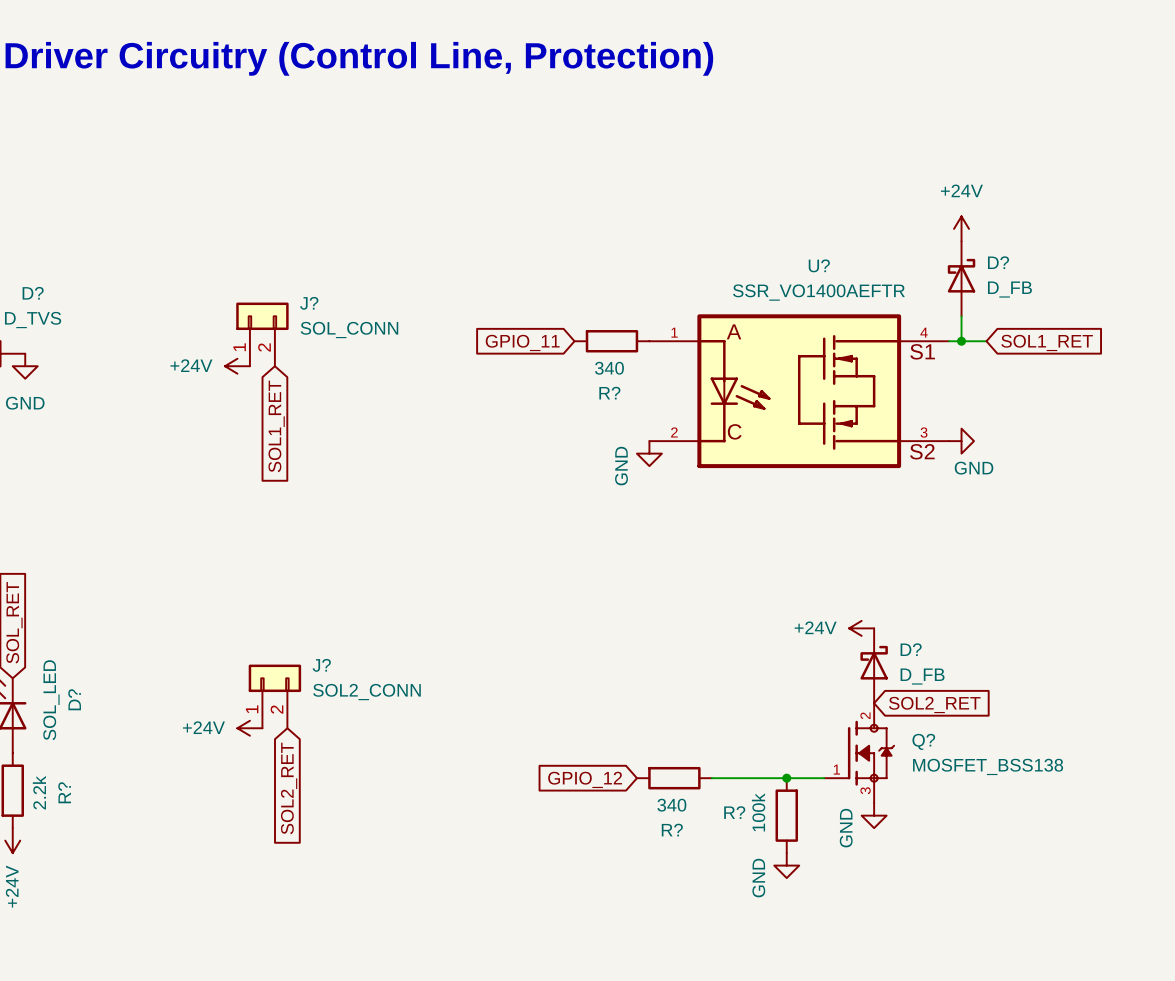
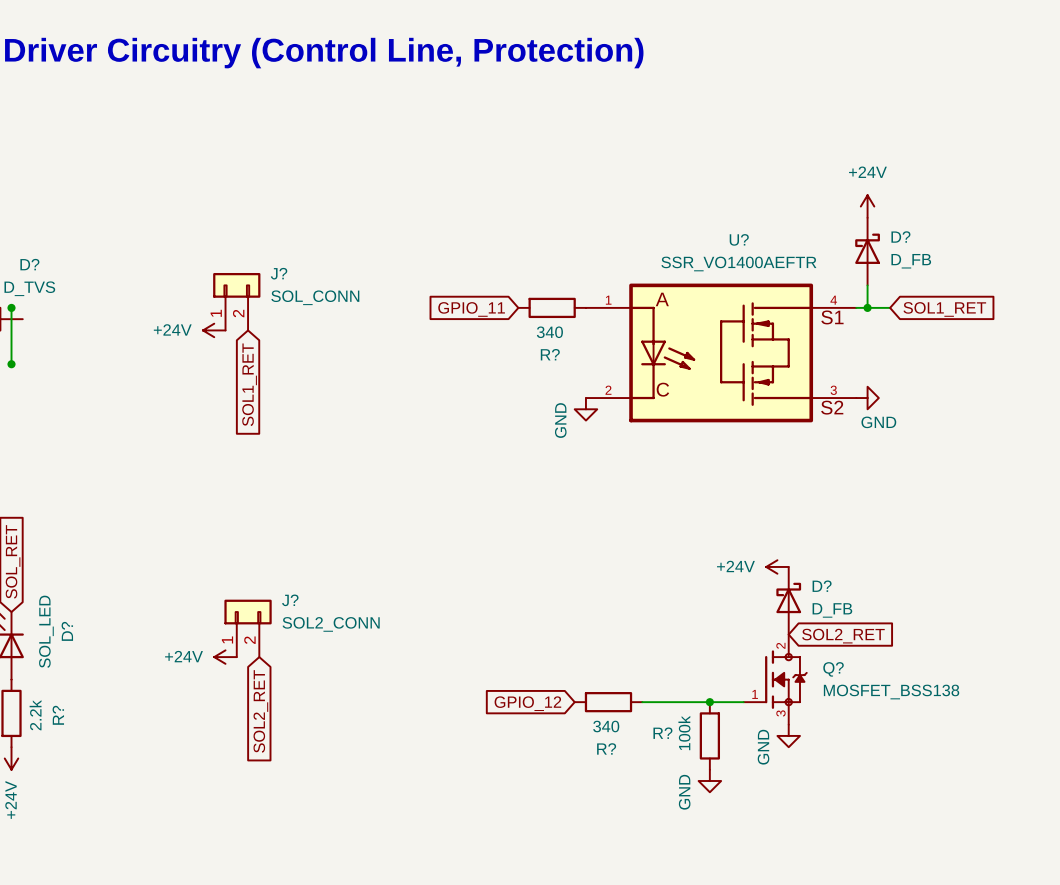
wire: none -> (11, 307) (11, 364)
junction: none -> (11, 307)
power symbol: GND (25, 366) -> none
junction: none -> (11, 364)

